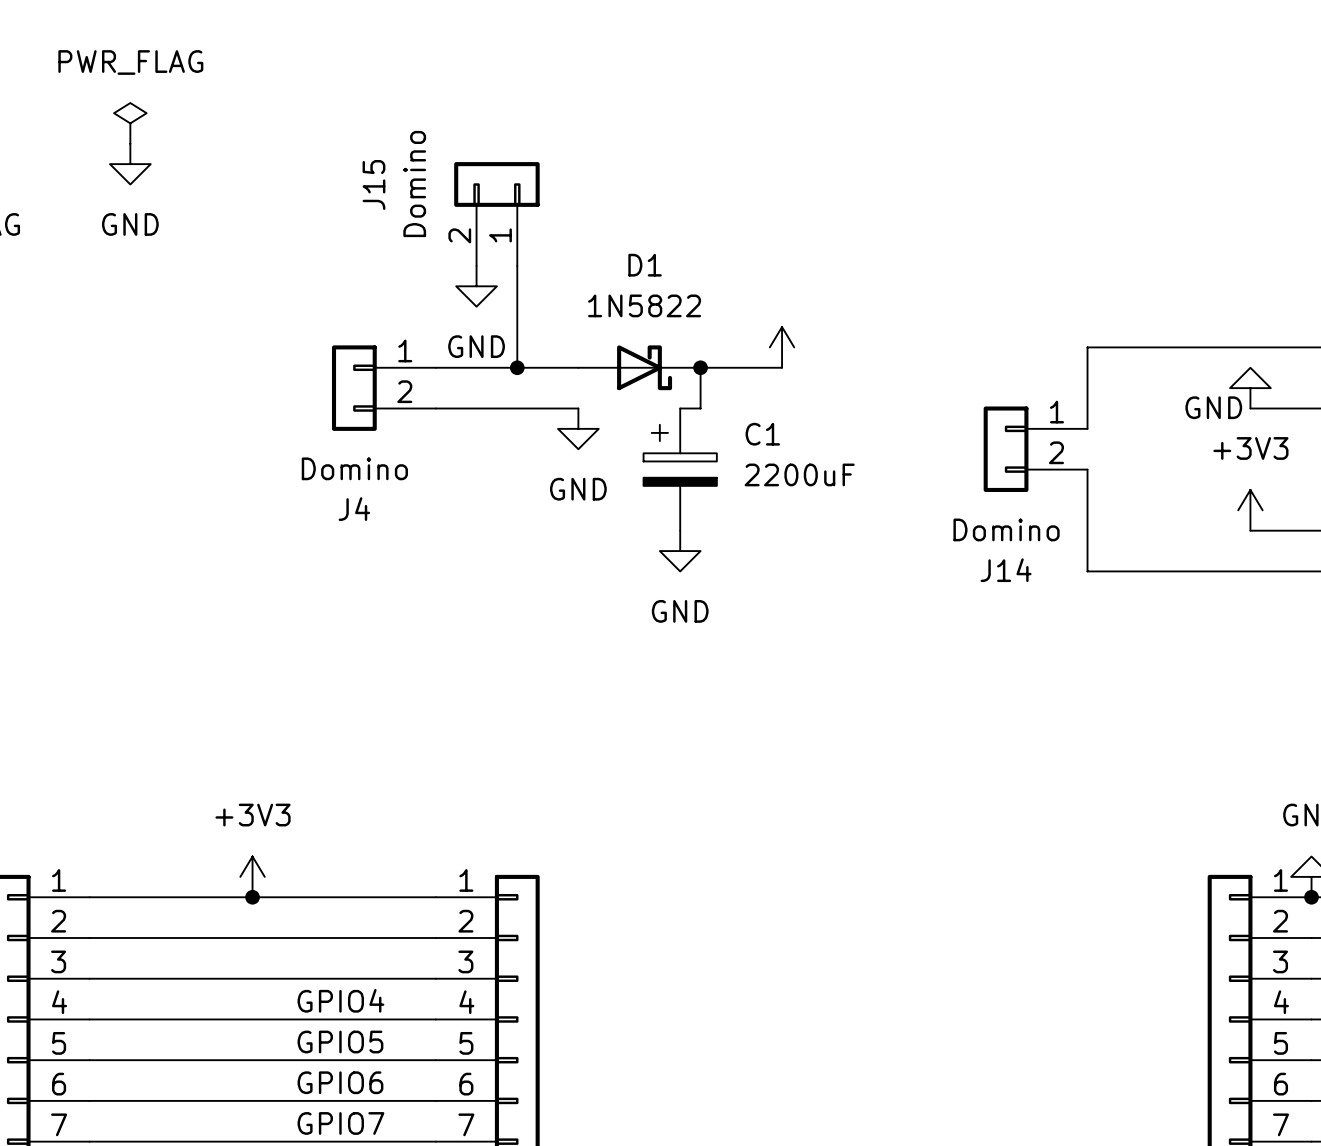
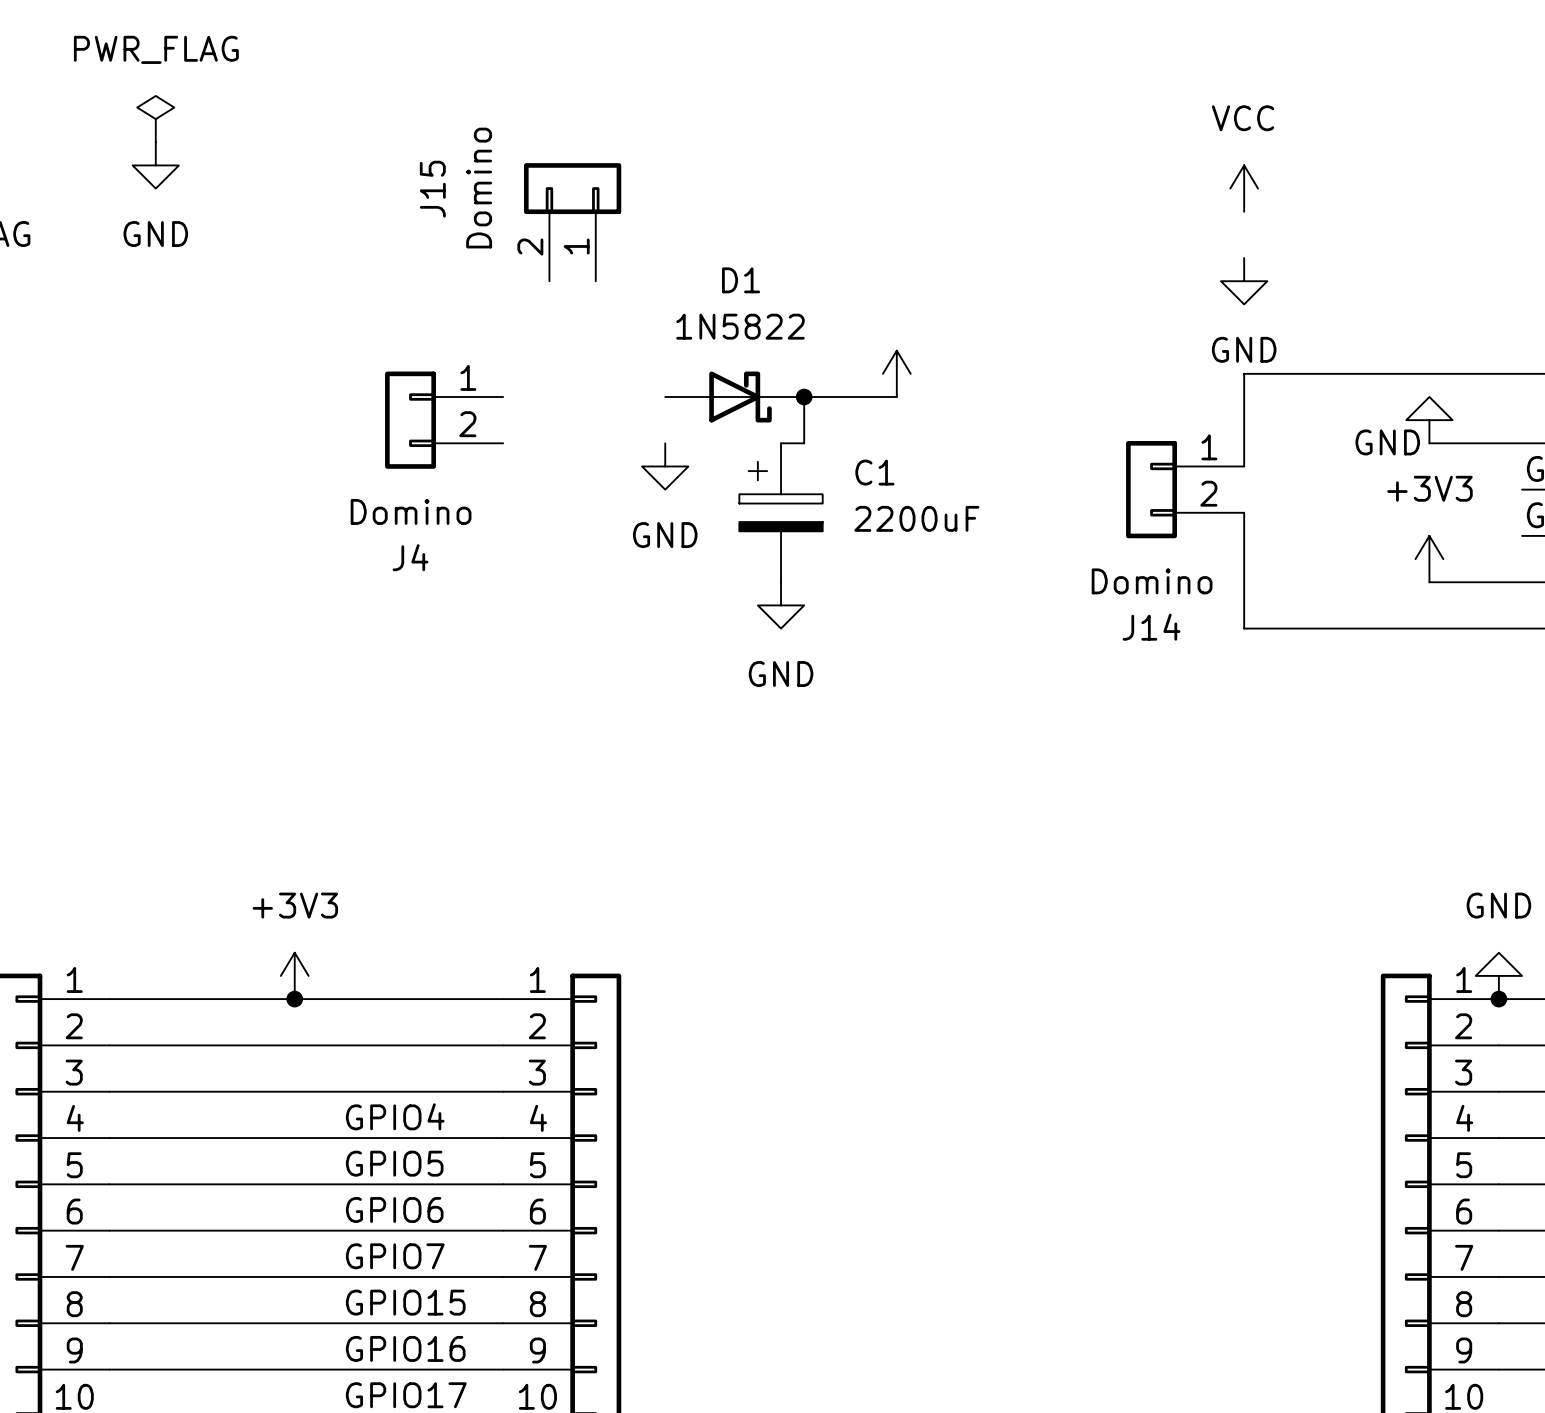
power symbol: none -> VCC (1244, 188)
wire: (517, 265) (517, 367) -> none
power symbol: none -> GND (1244, 281)
power symbol: GND (476, 286) -> none
wire: (435, 367) (578, 367) -> none
junction: (517, 367) -> none
wire: (435, 408) (578, 408) -> none

